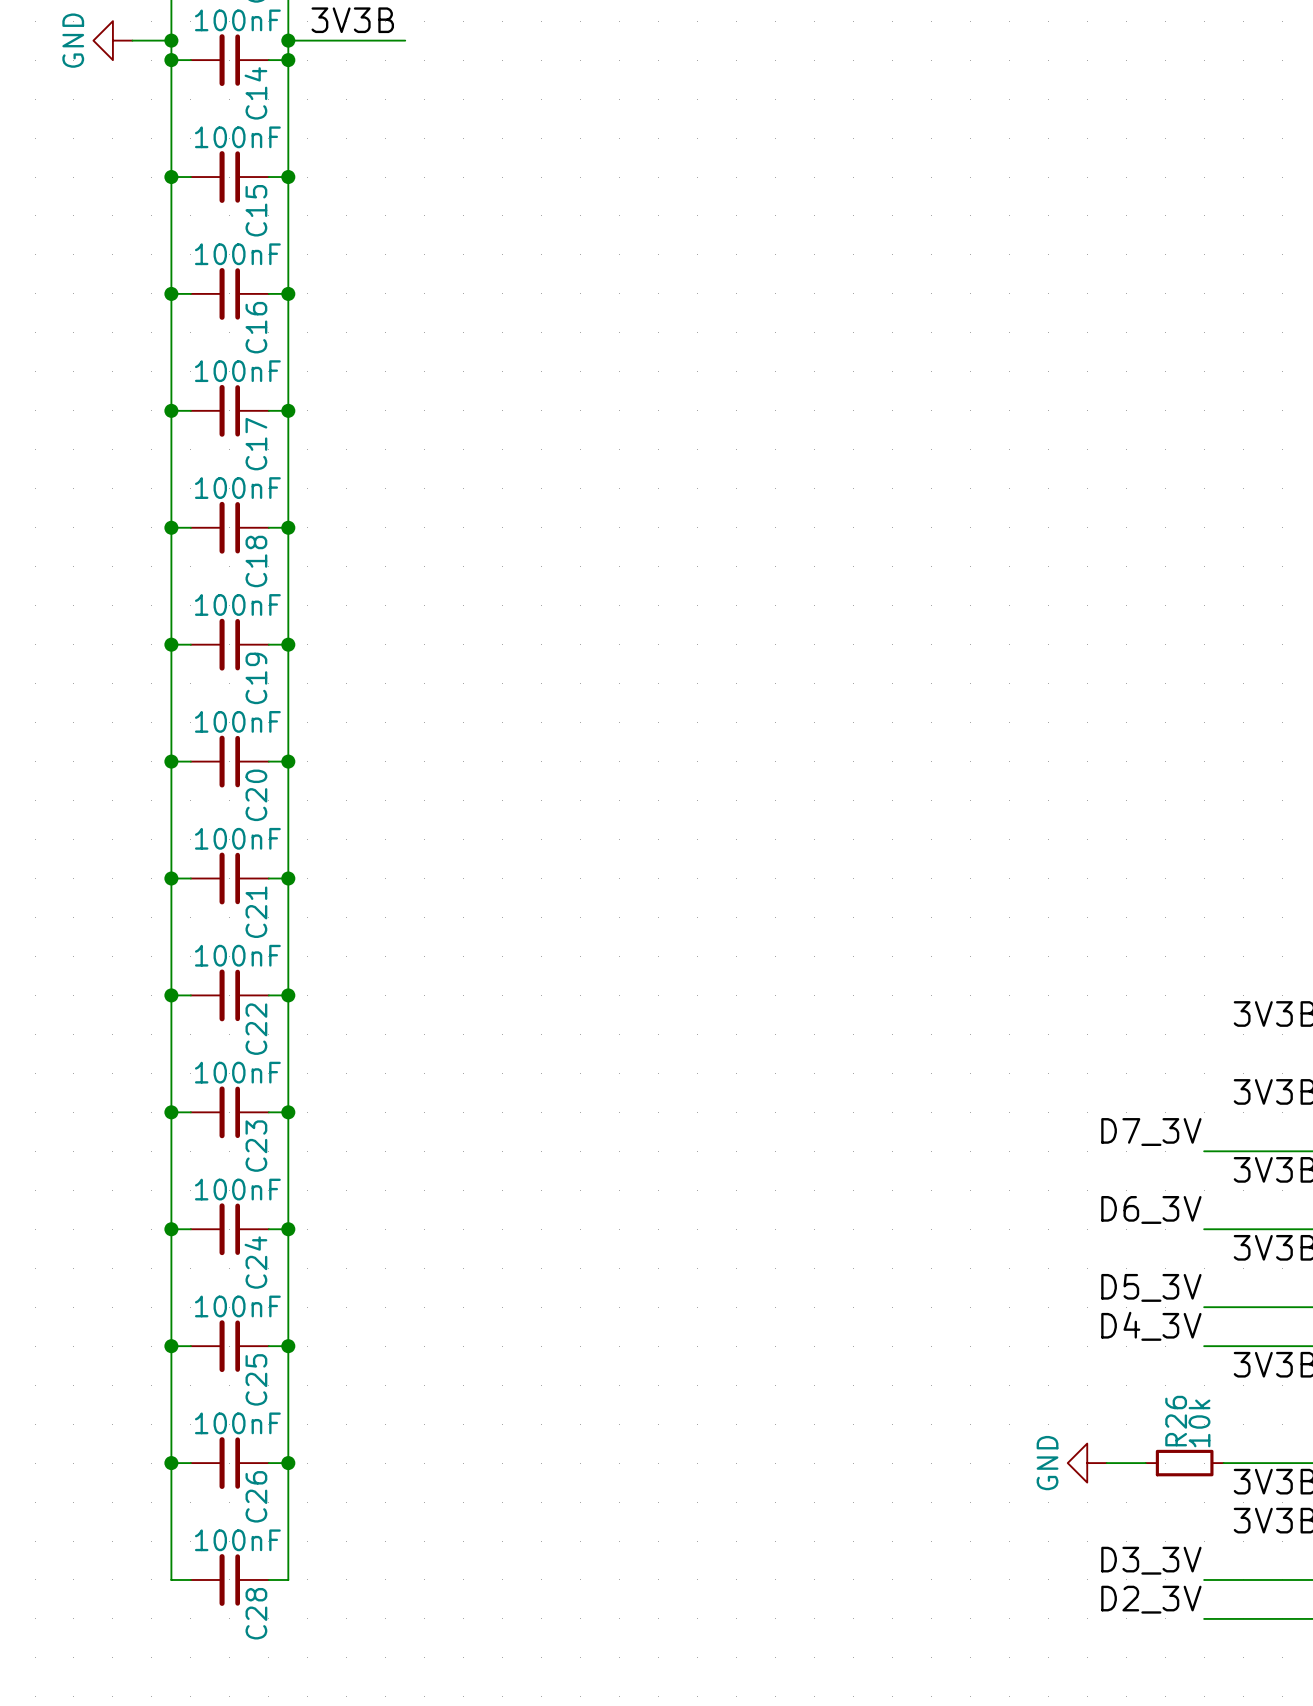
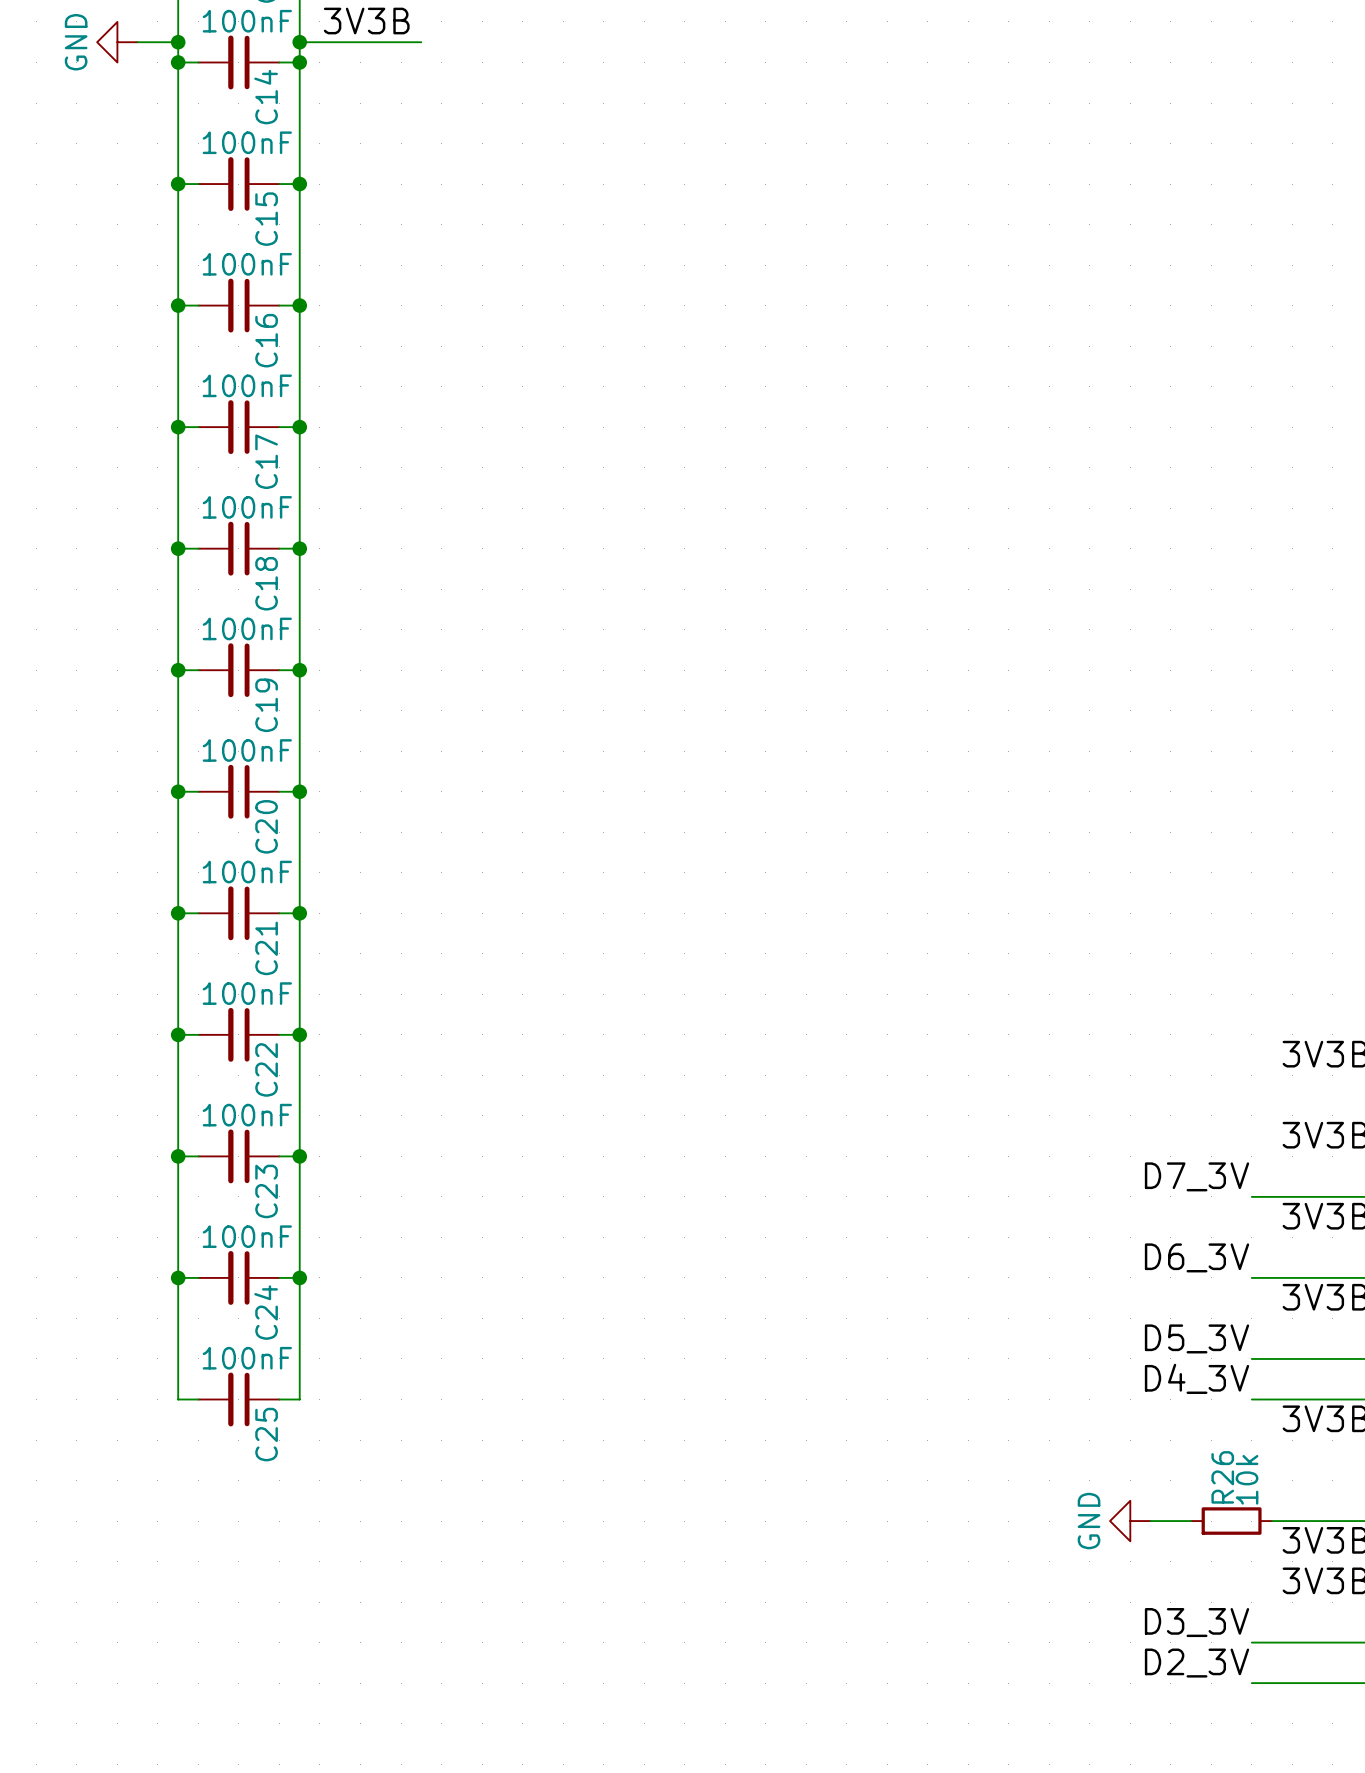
wire: (171, 1346) (171, 1579) (190, 1579) -> none
junction: (171, 1346) -> none
wire: (288, 1346) (288, 1579) (268, 1579) -> none
junction: (288, 1346) -> none
wire: (171, 1463) (190, 1463) -> none
junction: (171, 1463) -> none
C26: 100nF (229, 1463) -> none
wire: (268, 1463) (288, 1463) -> none
junction: (288, 1463) -> none
C28: 100nF (229, 1579) -> none

